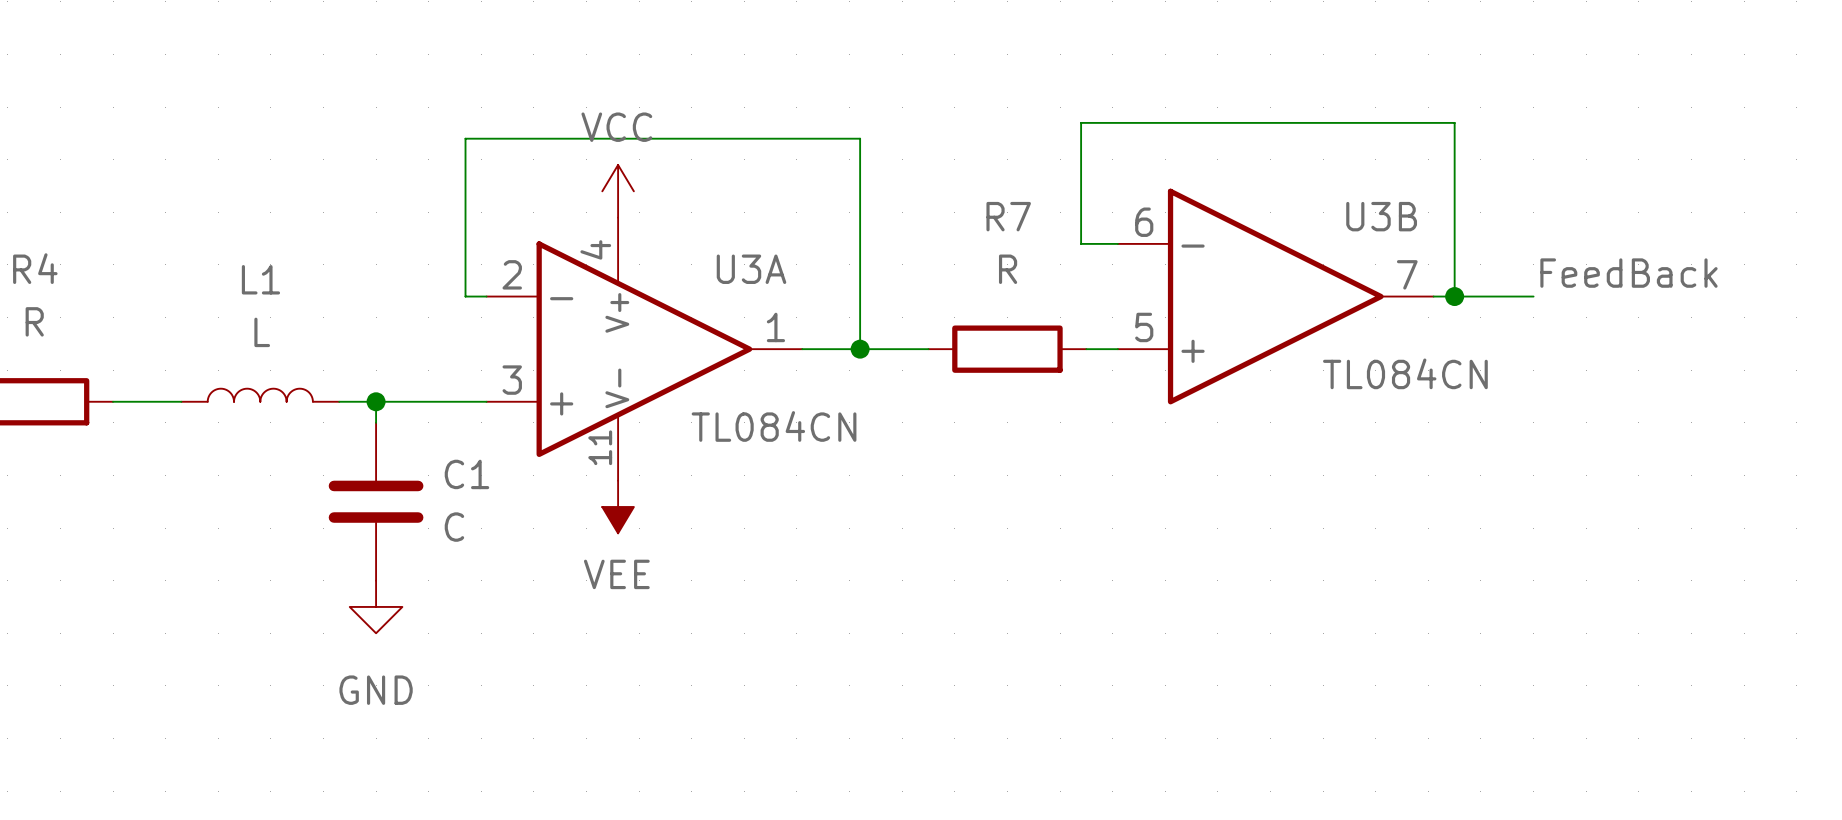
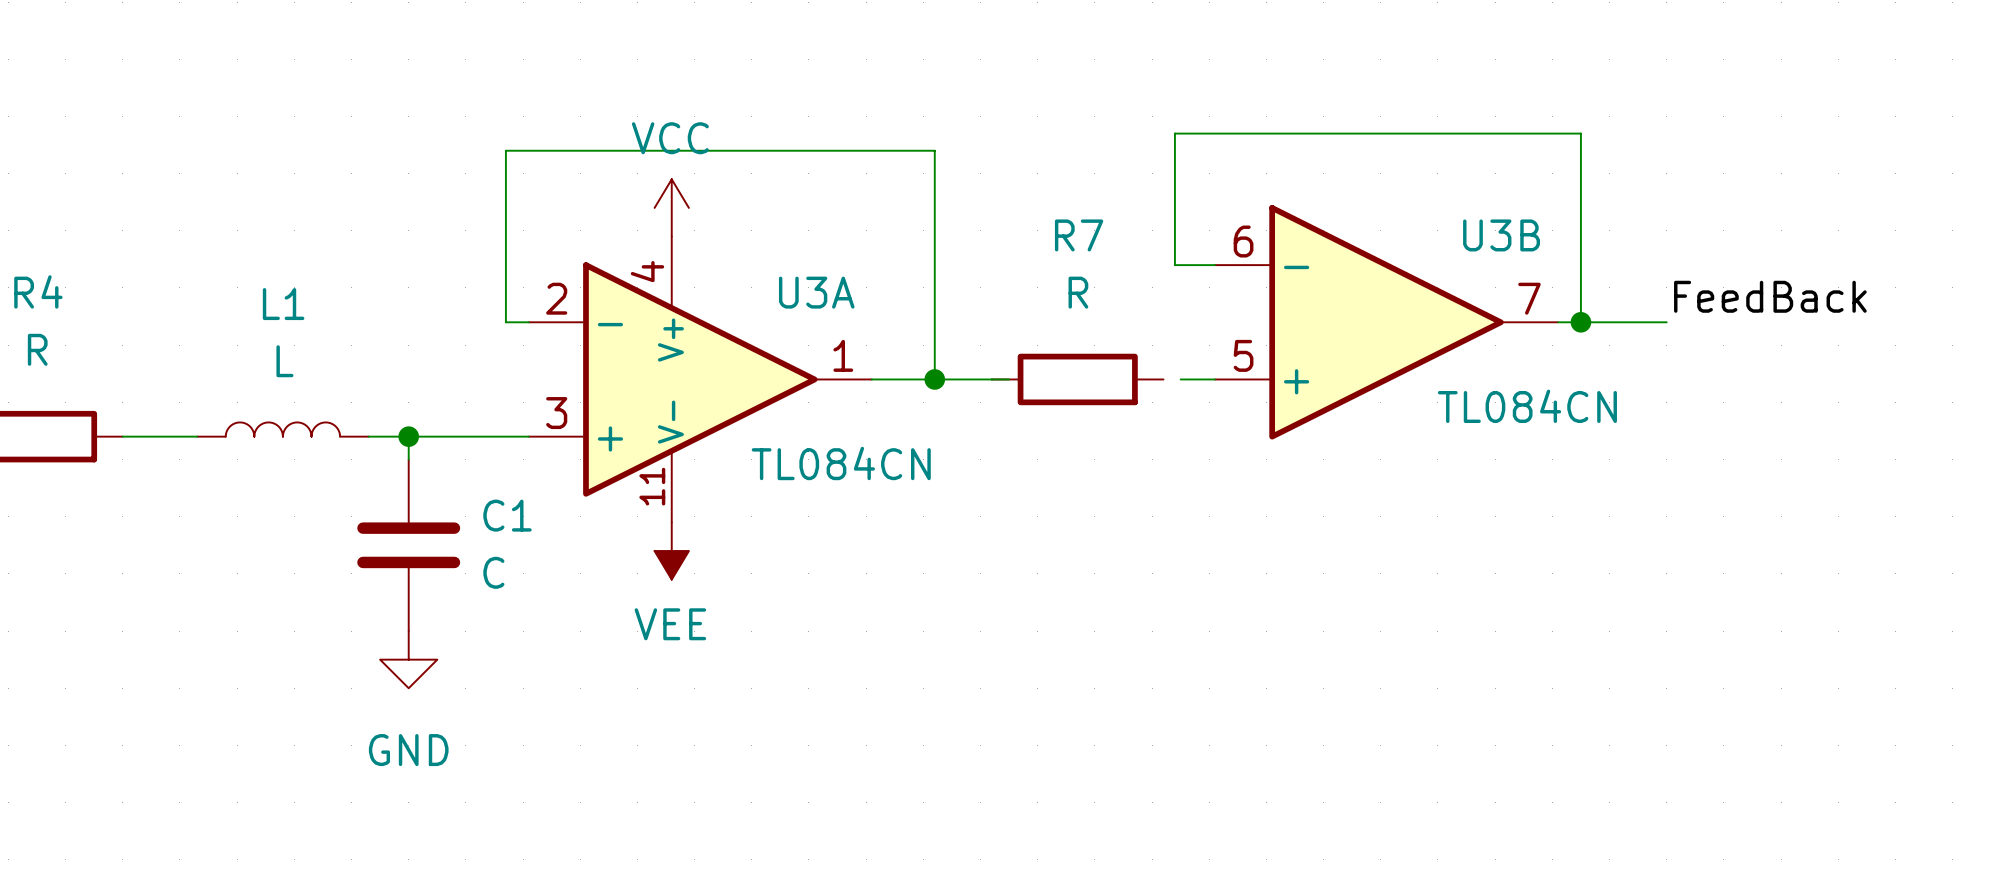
R7 position: (1007, 349) -> (1077, 379)

